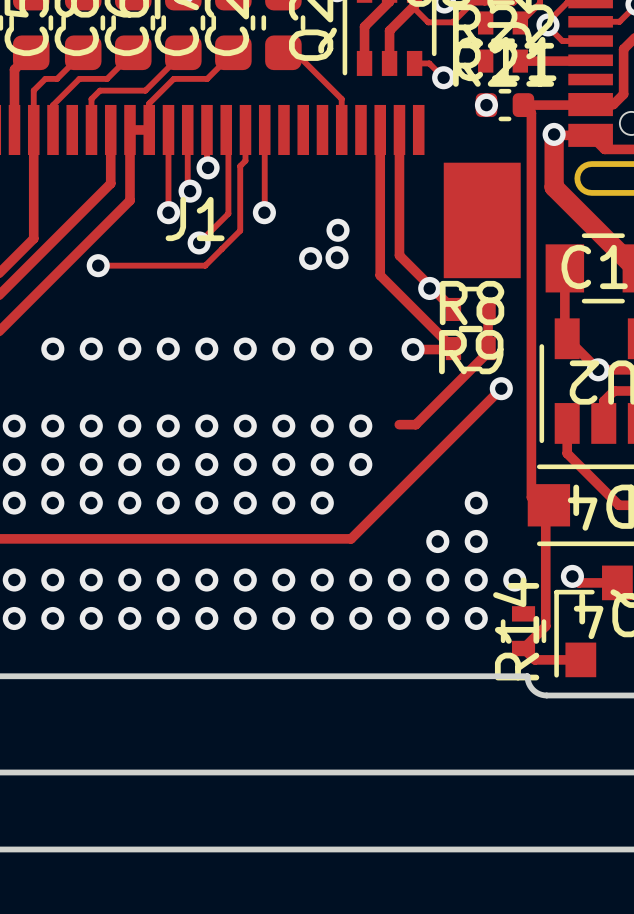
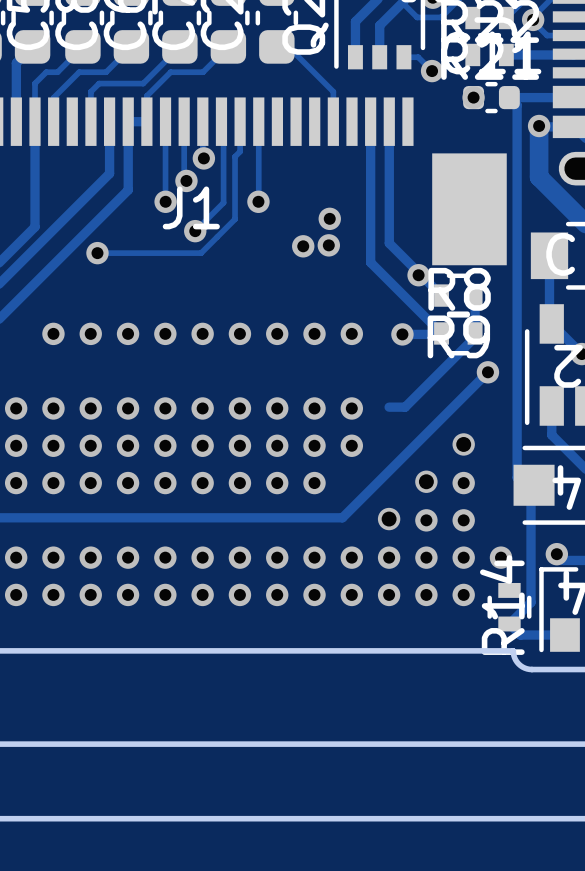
via: none -> (463, 444)
via: none -> (426, 481)
via: none -> (389, 519)

